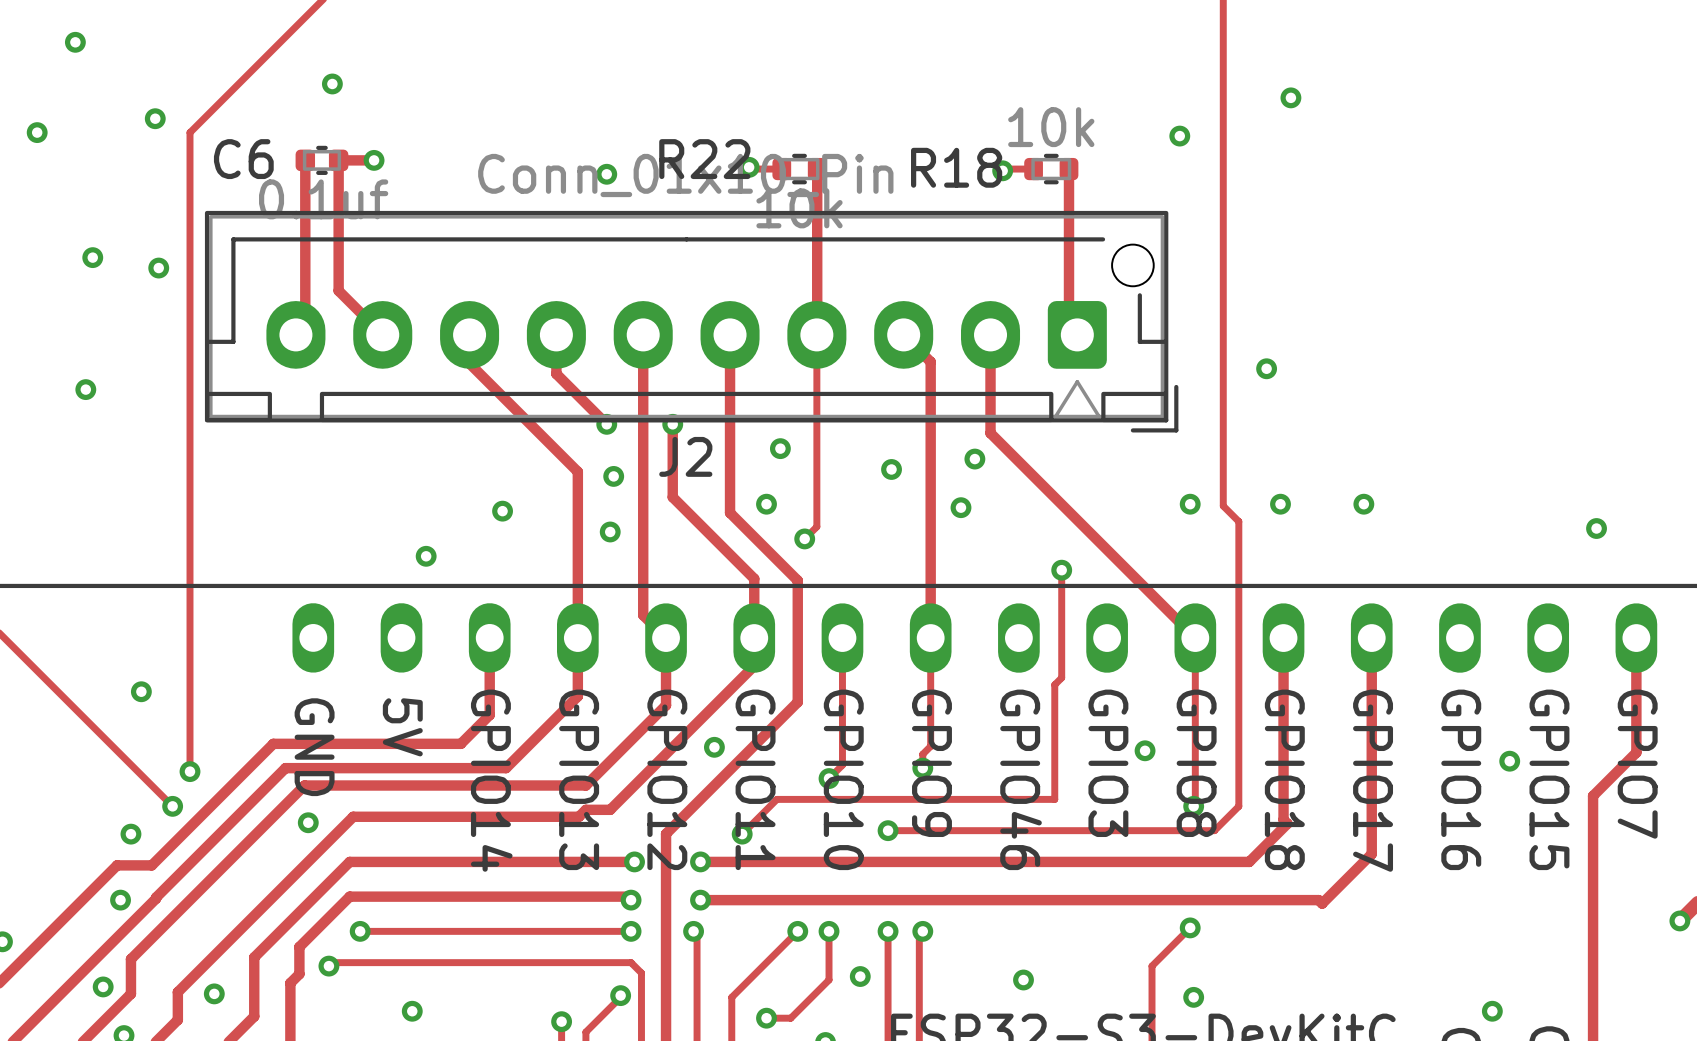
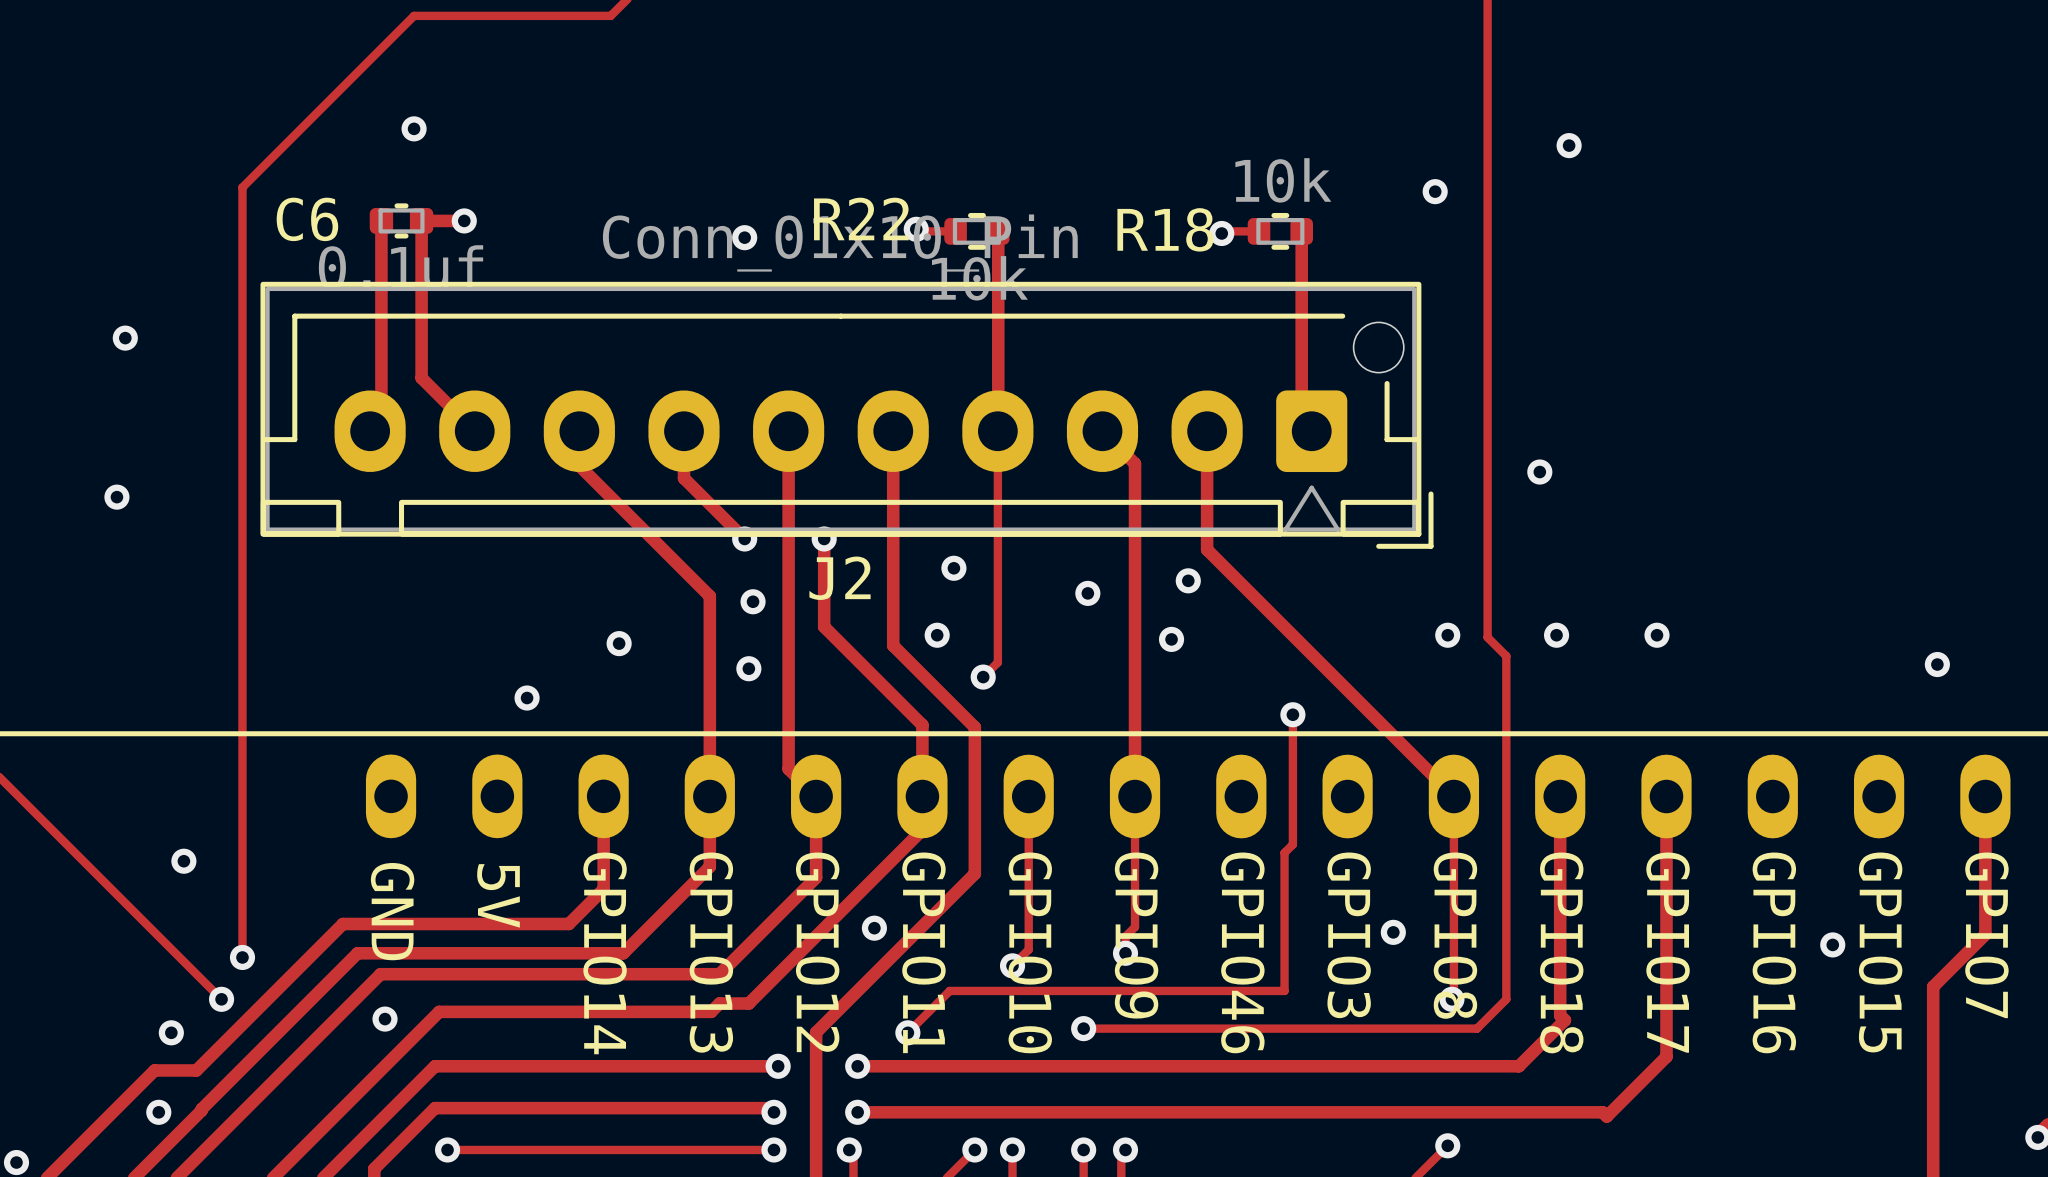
via: (75, 42) -> none
via: (155, 118) -> none
via: (37, 132) -> none
via: (158, 268) -> none

